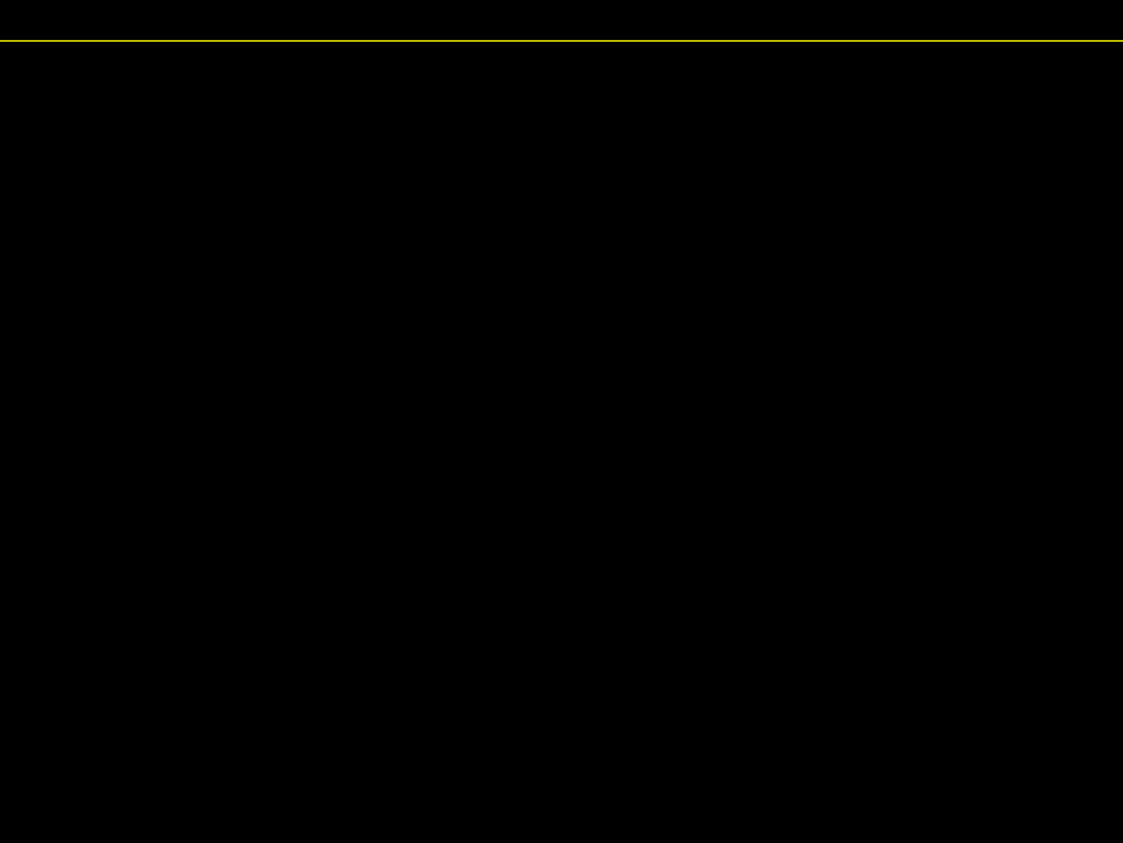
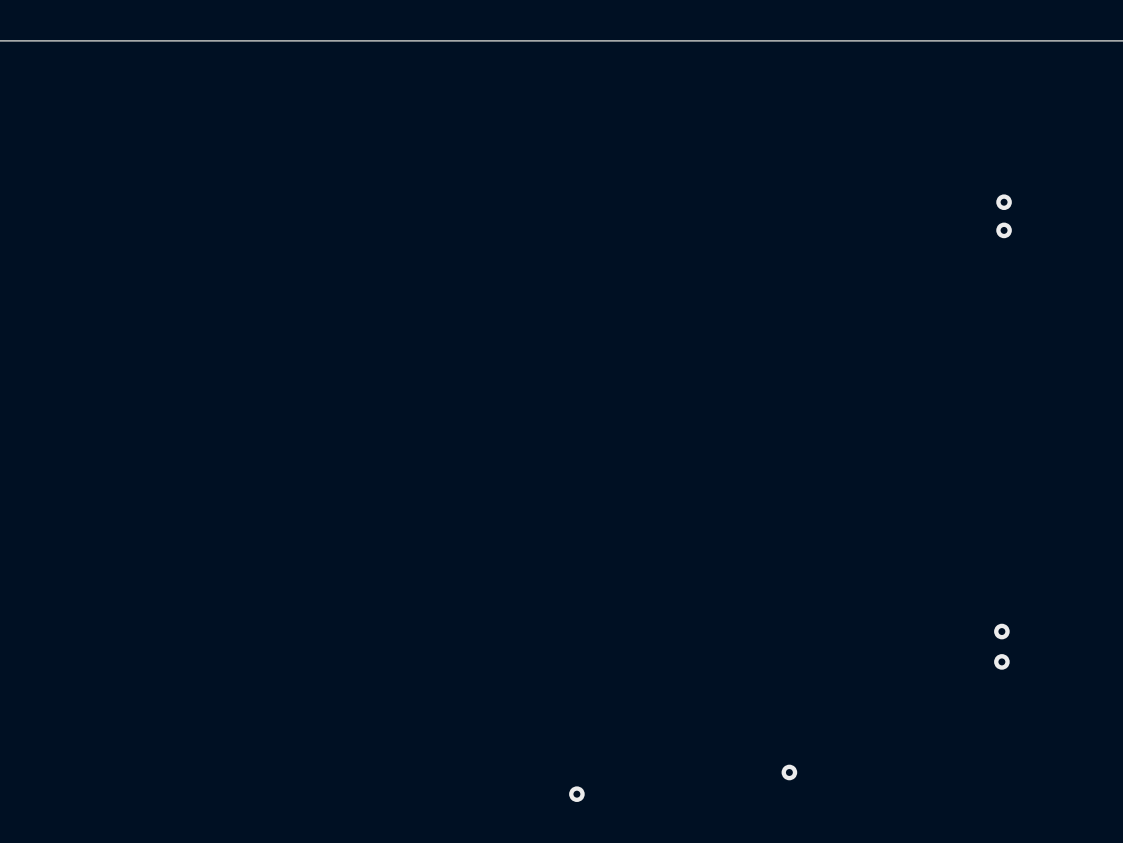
via: none -> (1004, 202)
via: none -> (1004, 230)
via: none -> (1001, 631)
via: none -> (1001, 661)
via: none -> (789, 772)
via: none -> (576, 794)

